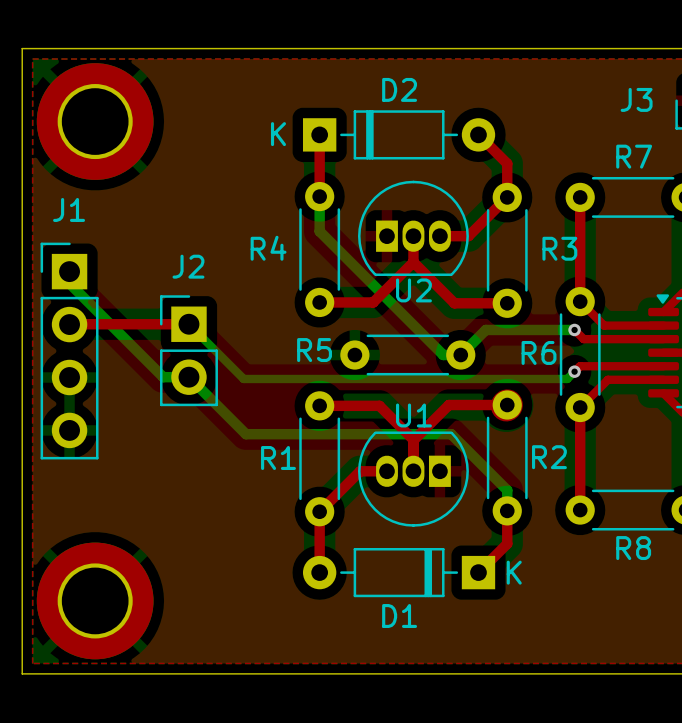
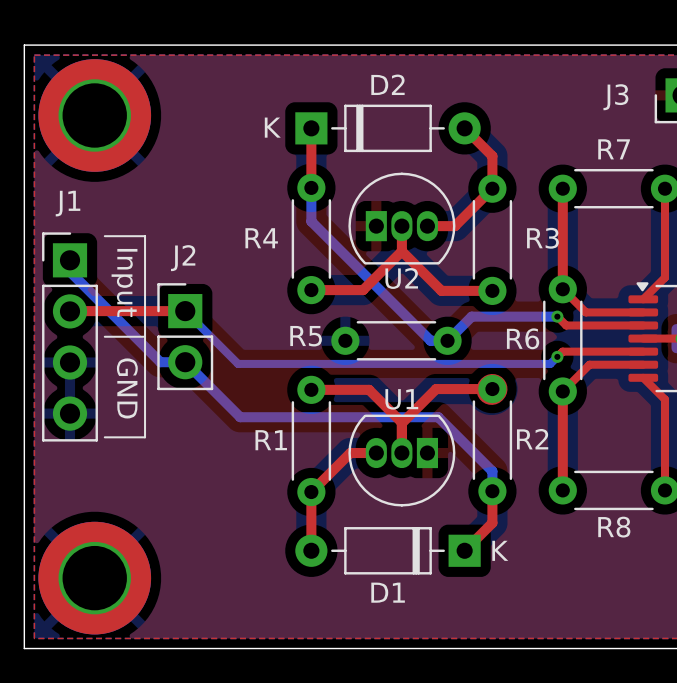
line: none -> (104, 236) (145, 236) (145, 437) (104, 437)
text: none -> Input (124, 282)
line: none -> (104, 336) (145, 336)
text: none -> GND (127, 388)

